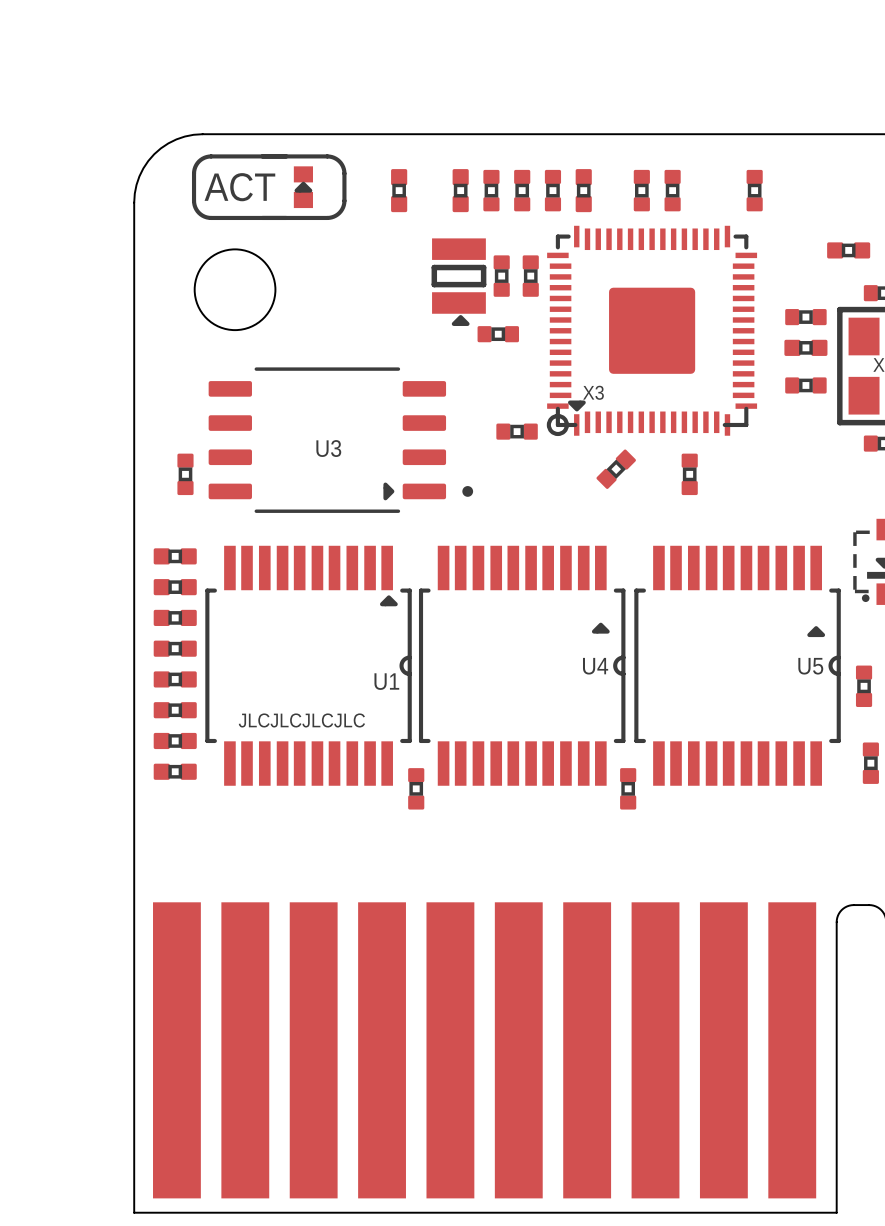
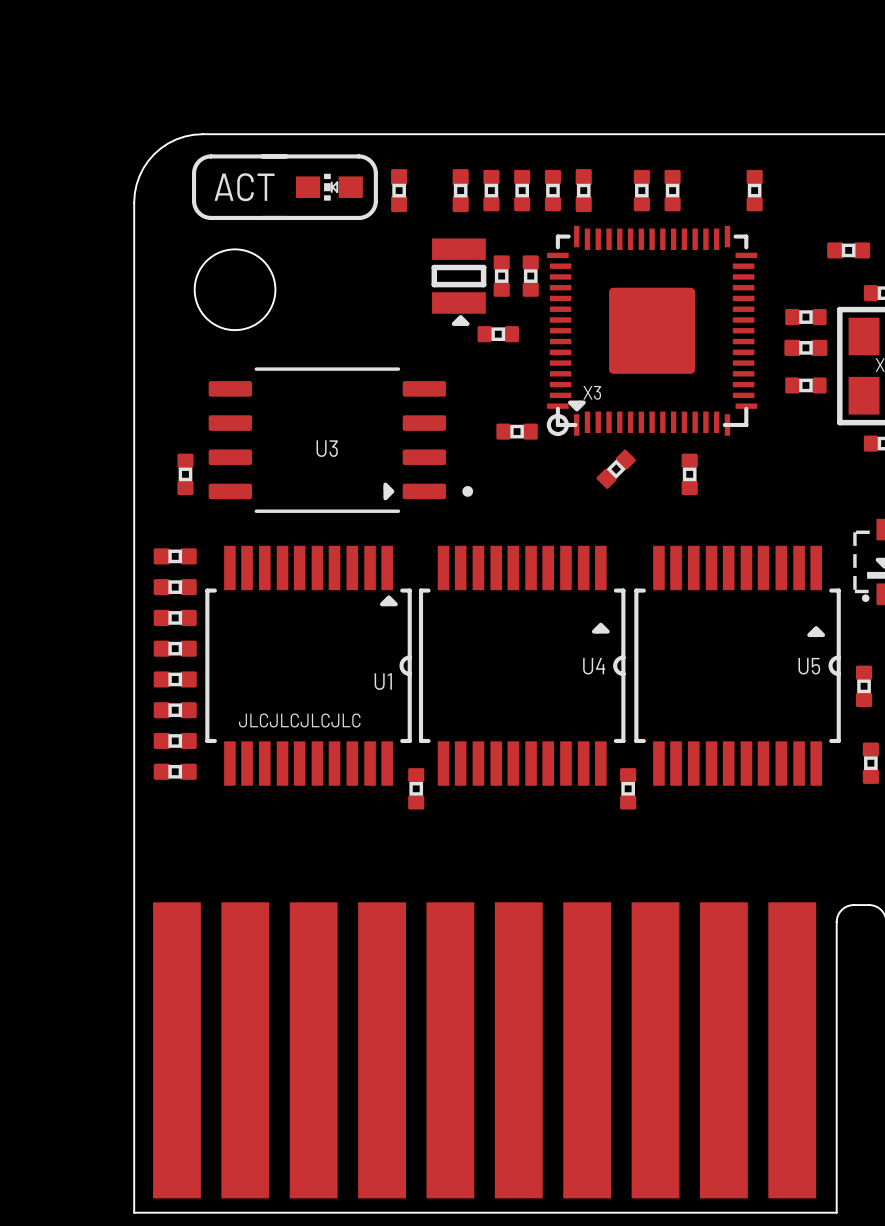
line: (327, 156) (339, 161) (344, 173) (343, 207) (337, 214) (327, 217) -> (327, 156) (365, 157) (372, 163) (375, 173) (375, 203) (370, 212) (361, 217) (327, 217)
part footprint: [293, 166, 313, 209] -> [295, 173, 363, 201]
drawing: [294, 181, 313, 193] -> none
line: none -> (331, 182) (331, 191)
line: none -> (337, 182) (332, 187) (337, 191) (337, 182)

